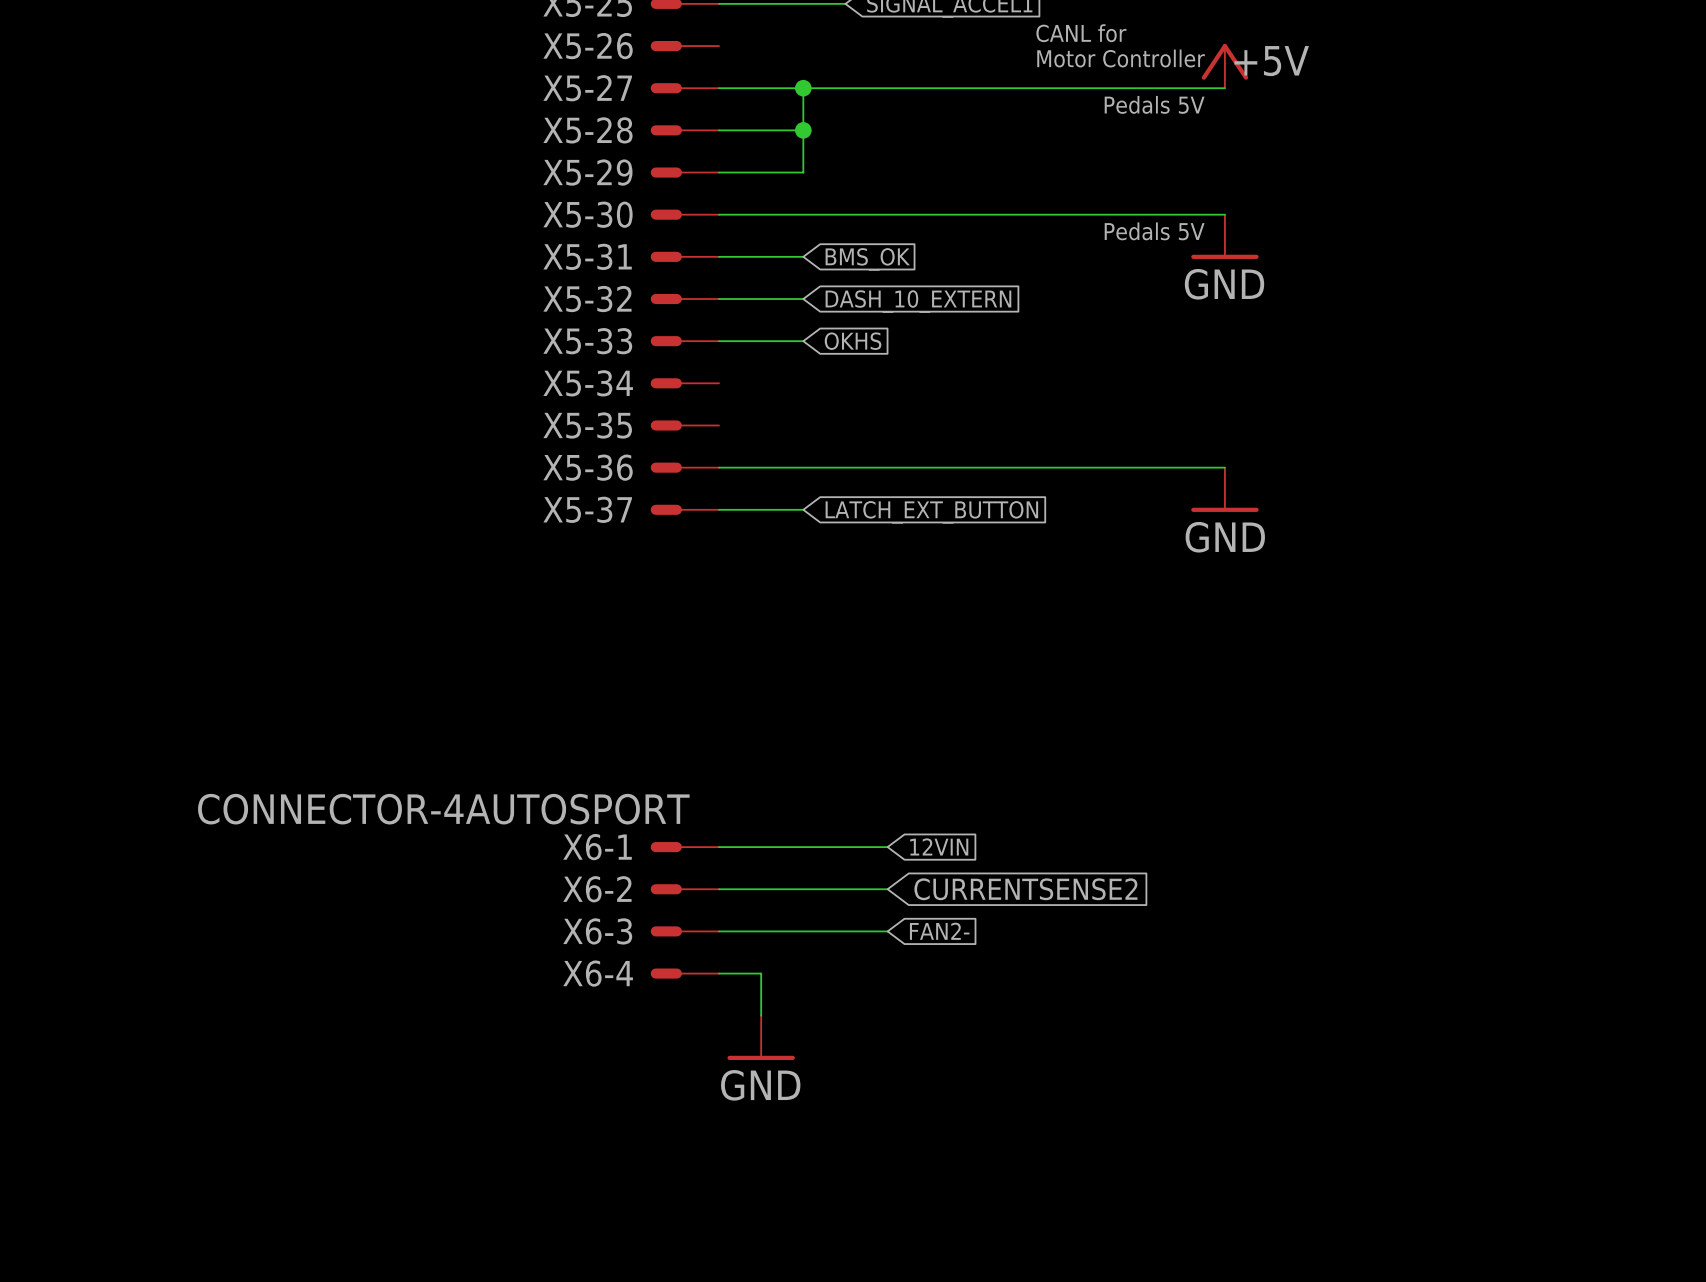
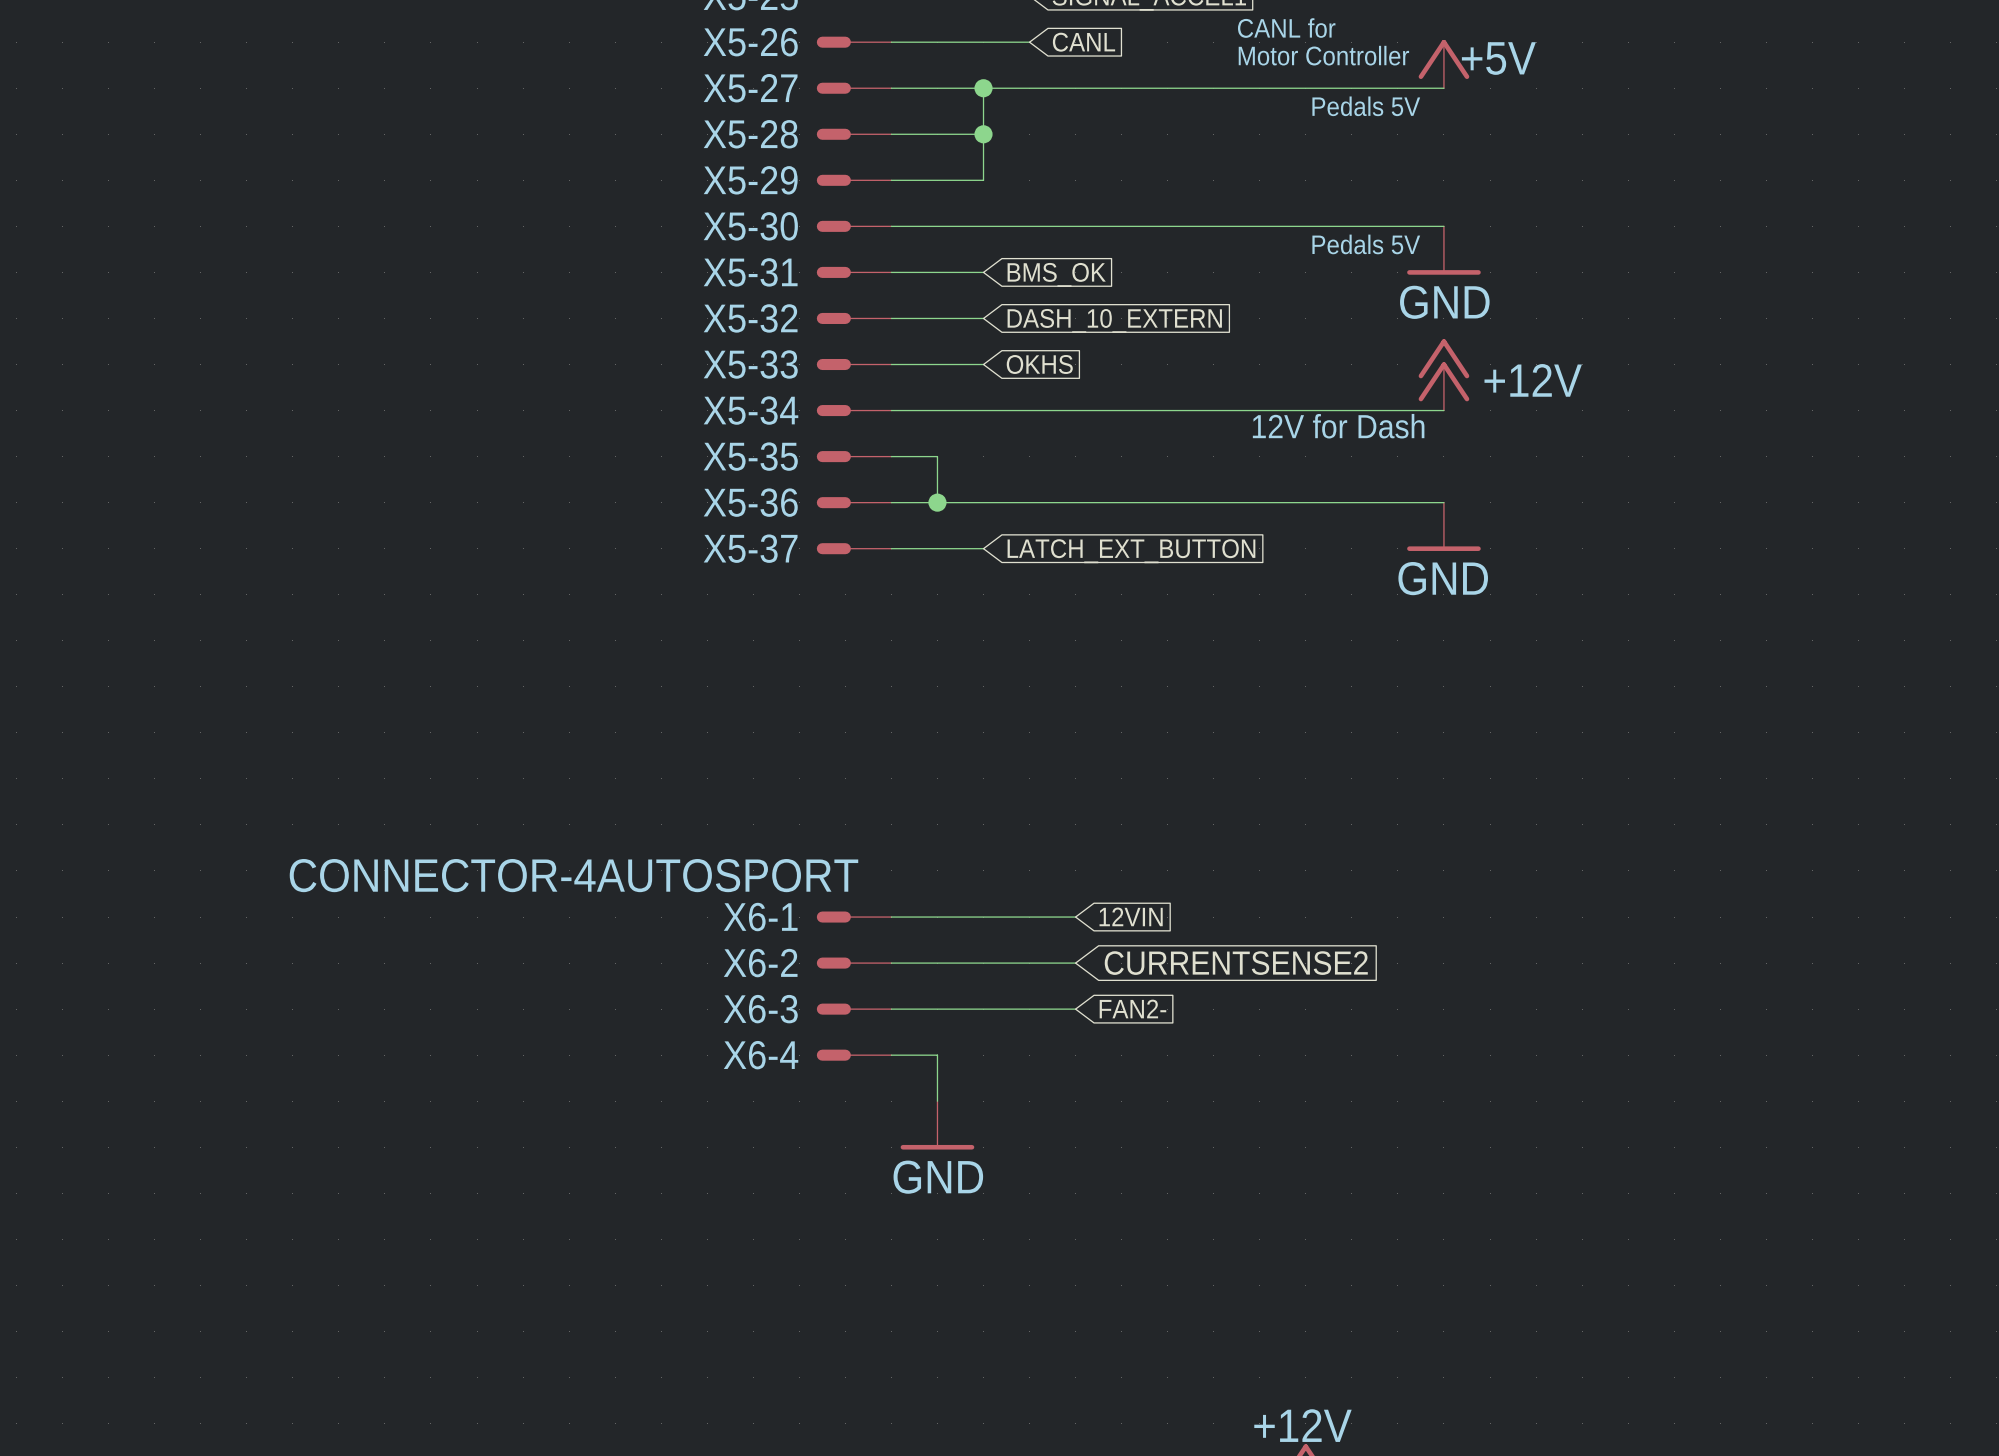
wire: none -> (891, 42) (1029, 42)
global label: none -> CANL (1084, 42)
power symbol: none -> +12V (1443, 374)
wire: none -> (891, 410) (1443, 410)
text: none -> 12V for Dash (1338, 426)
wire: none -> (891, 456) (937, 456) (937, 502)
junction: none -> (937, 502)

